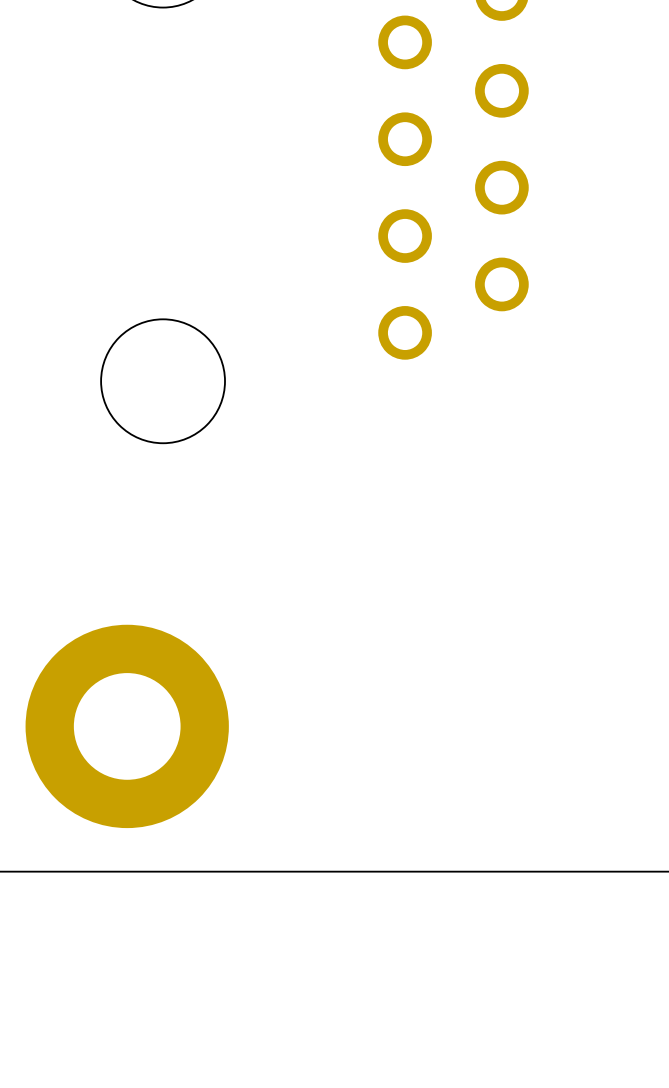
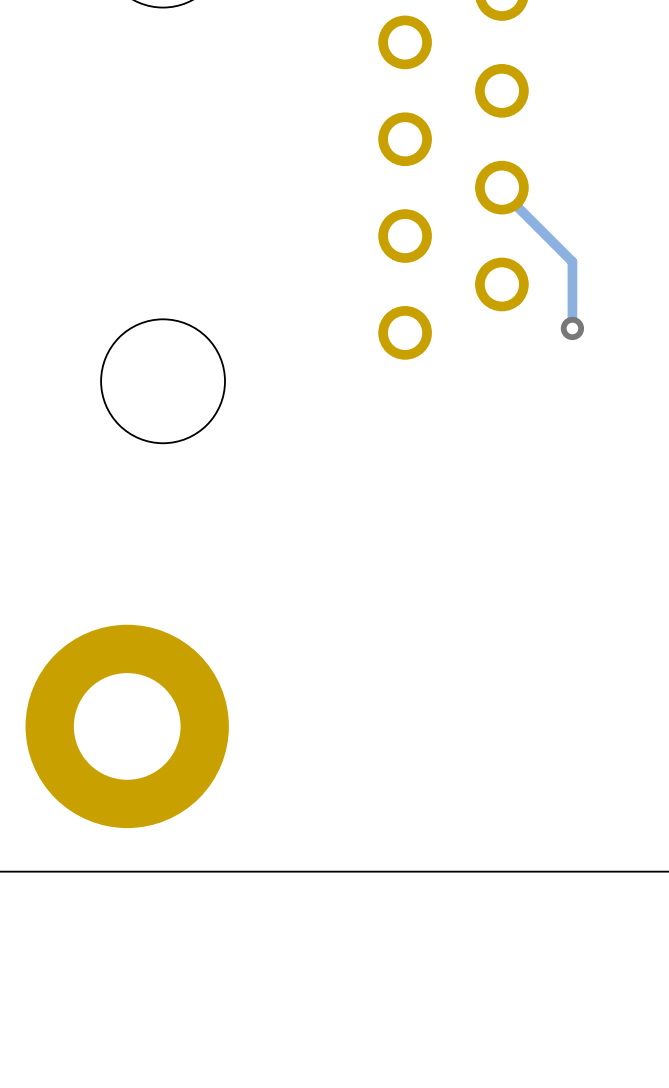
track: none -> (501, 187) (505, 195) (572, 261) (572, 328)
via: none -> (572, 328)

